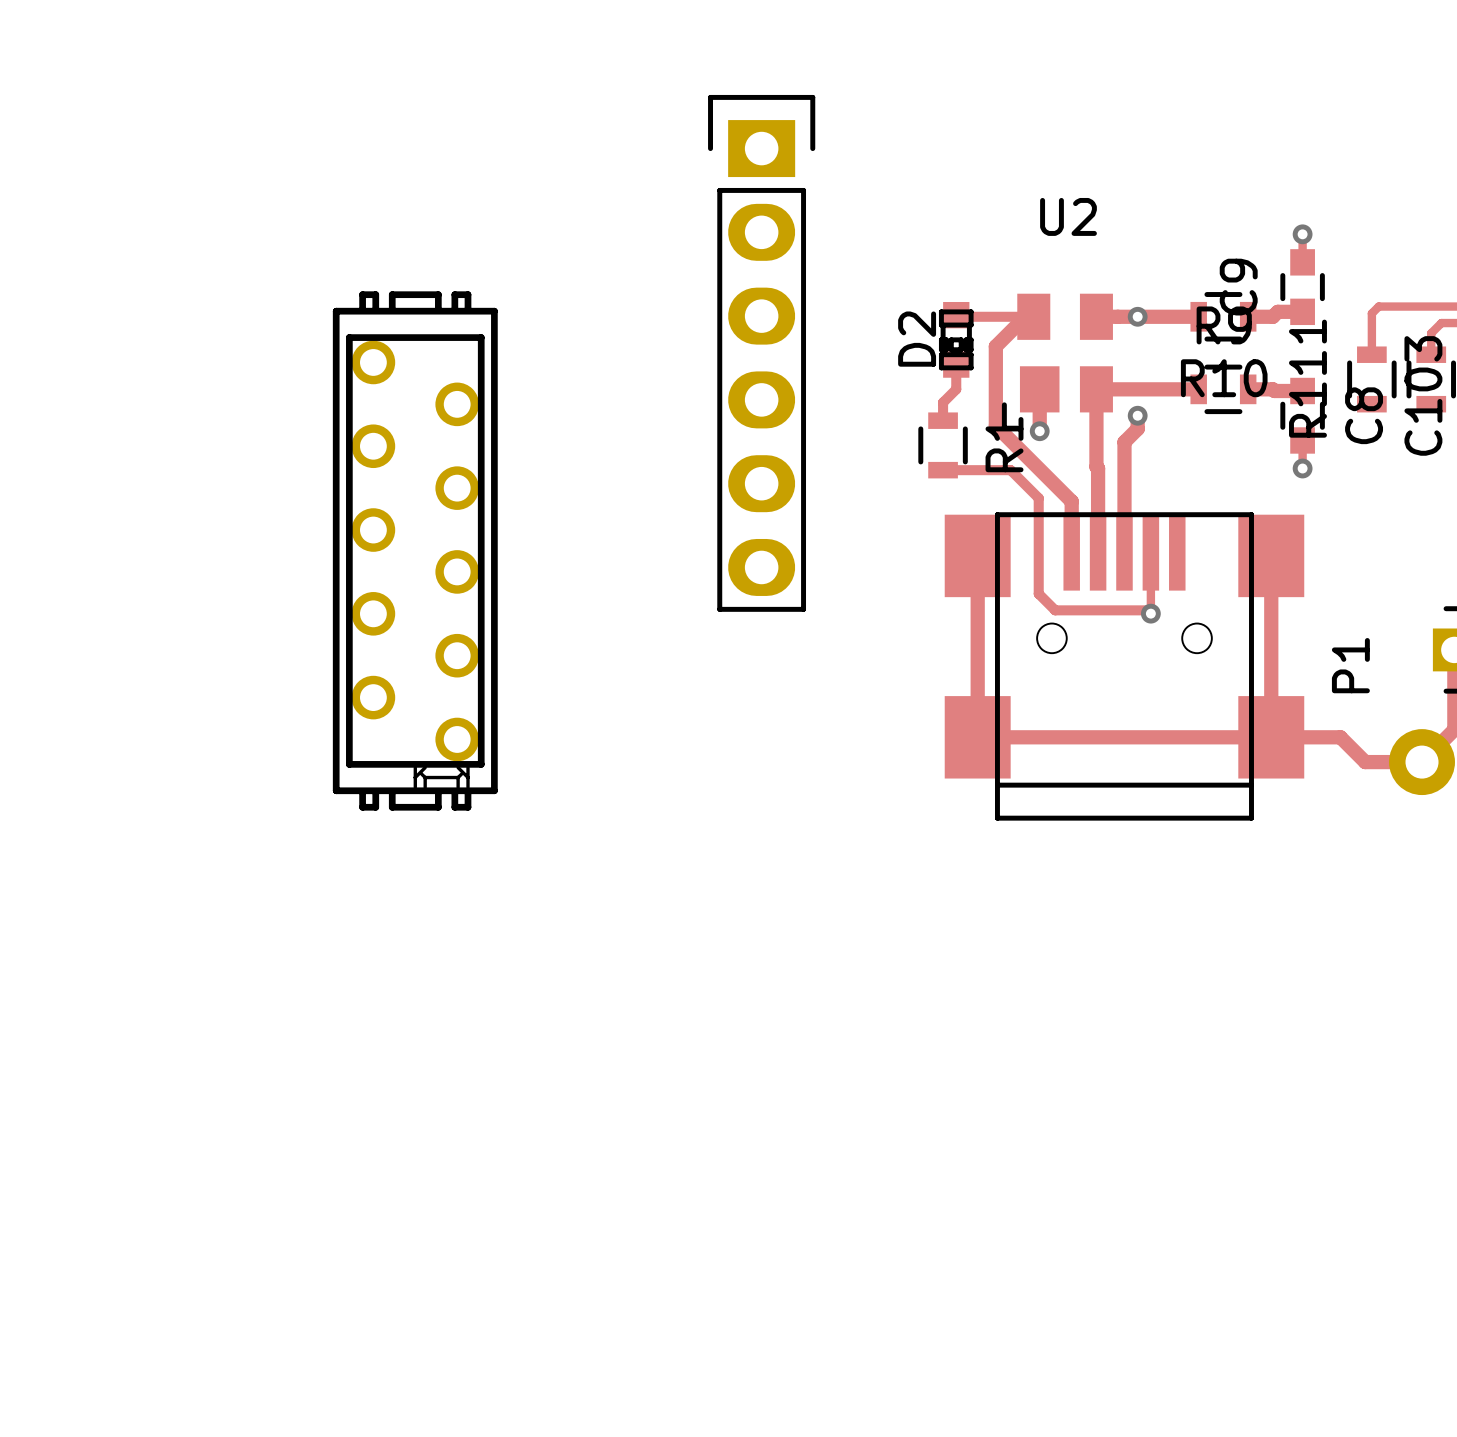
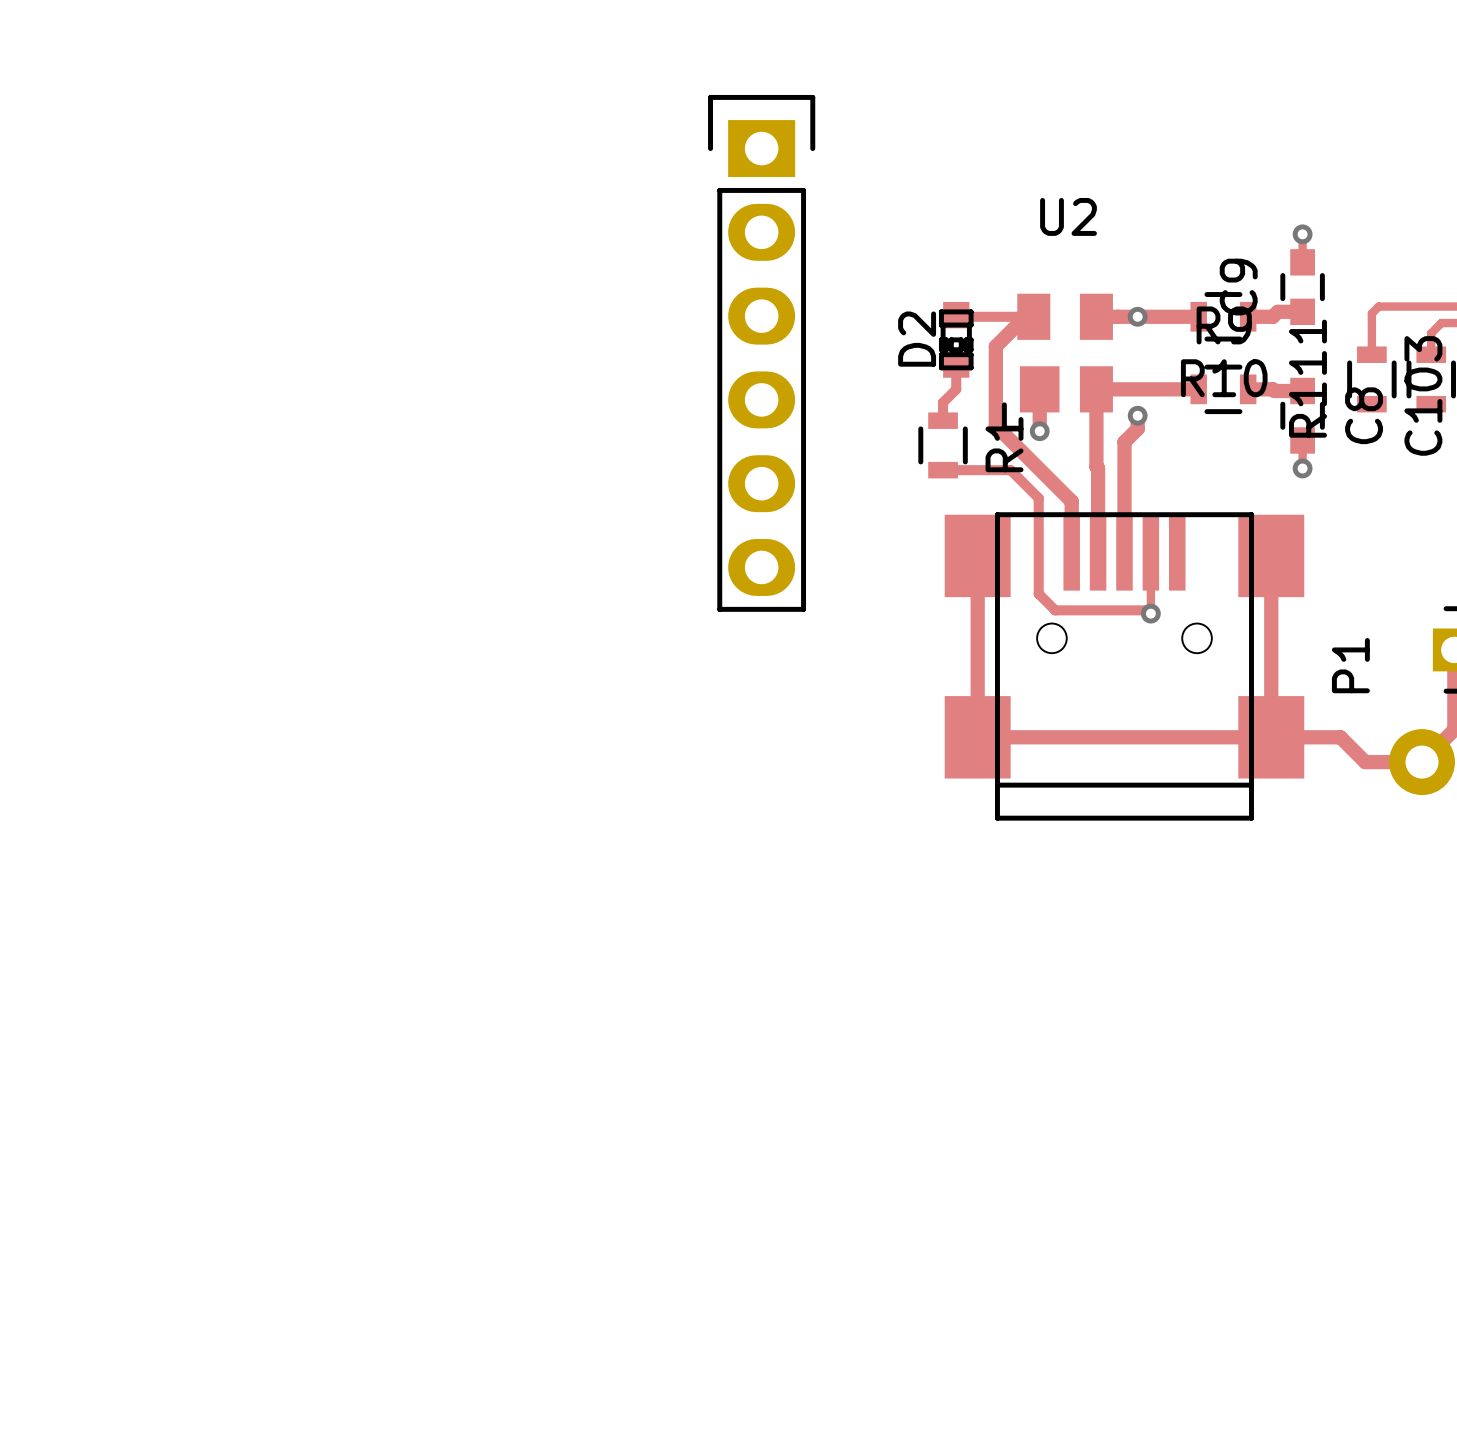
part: (415, 550) -> none

